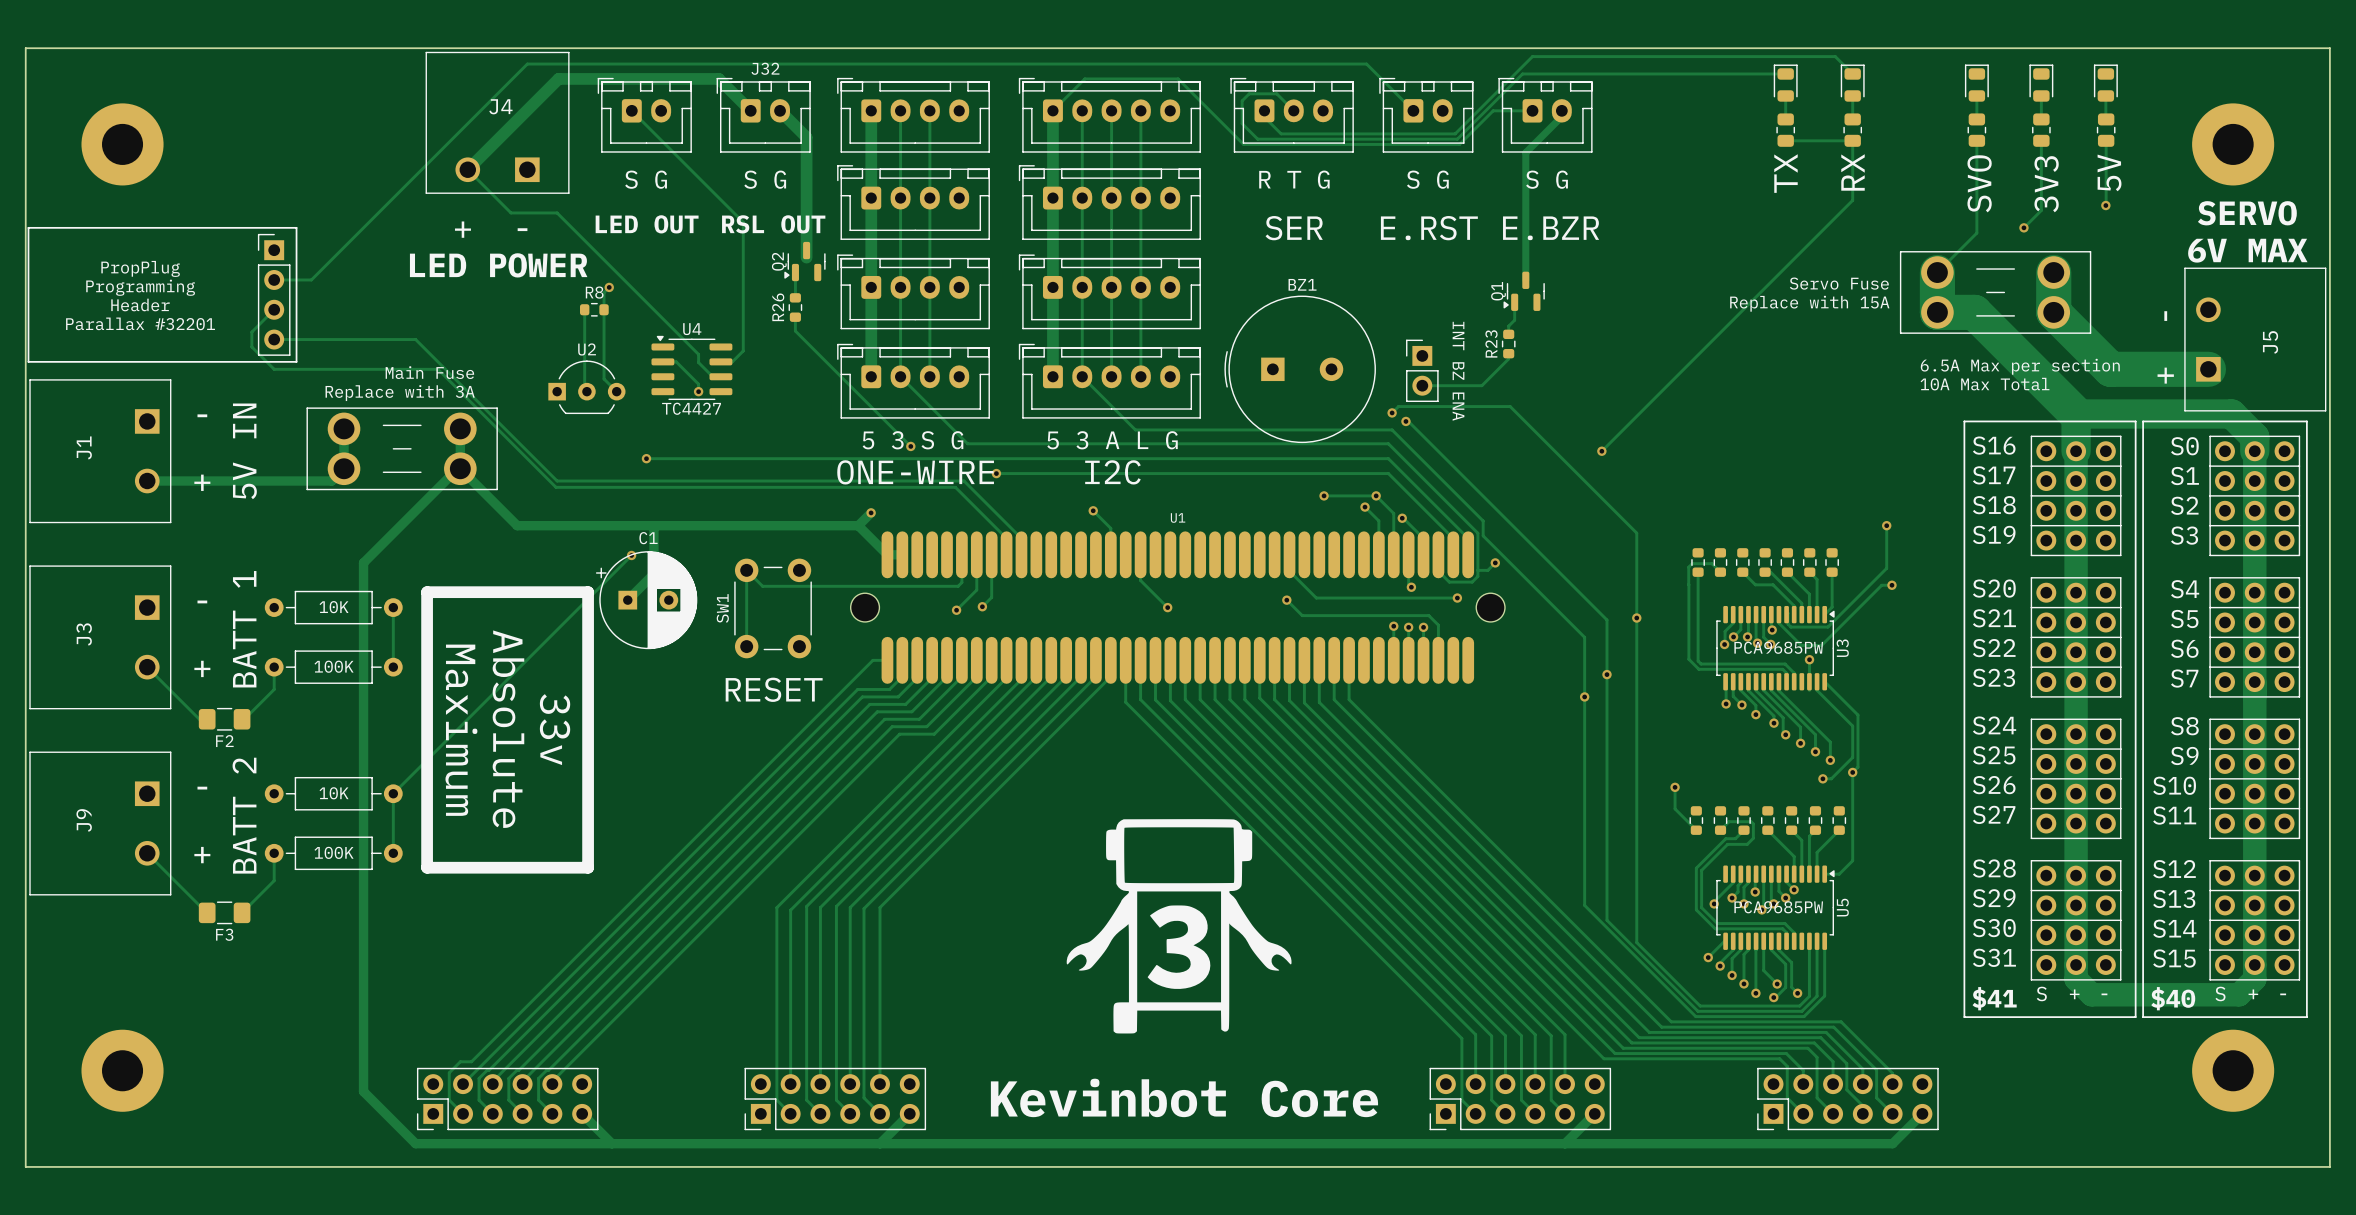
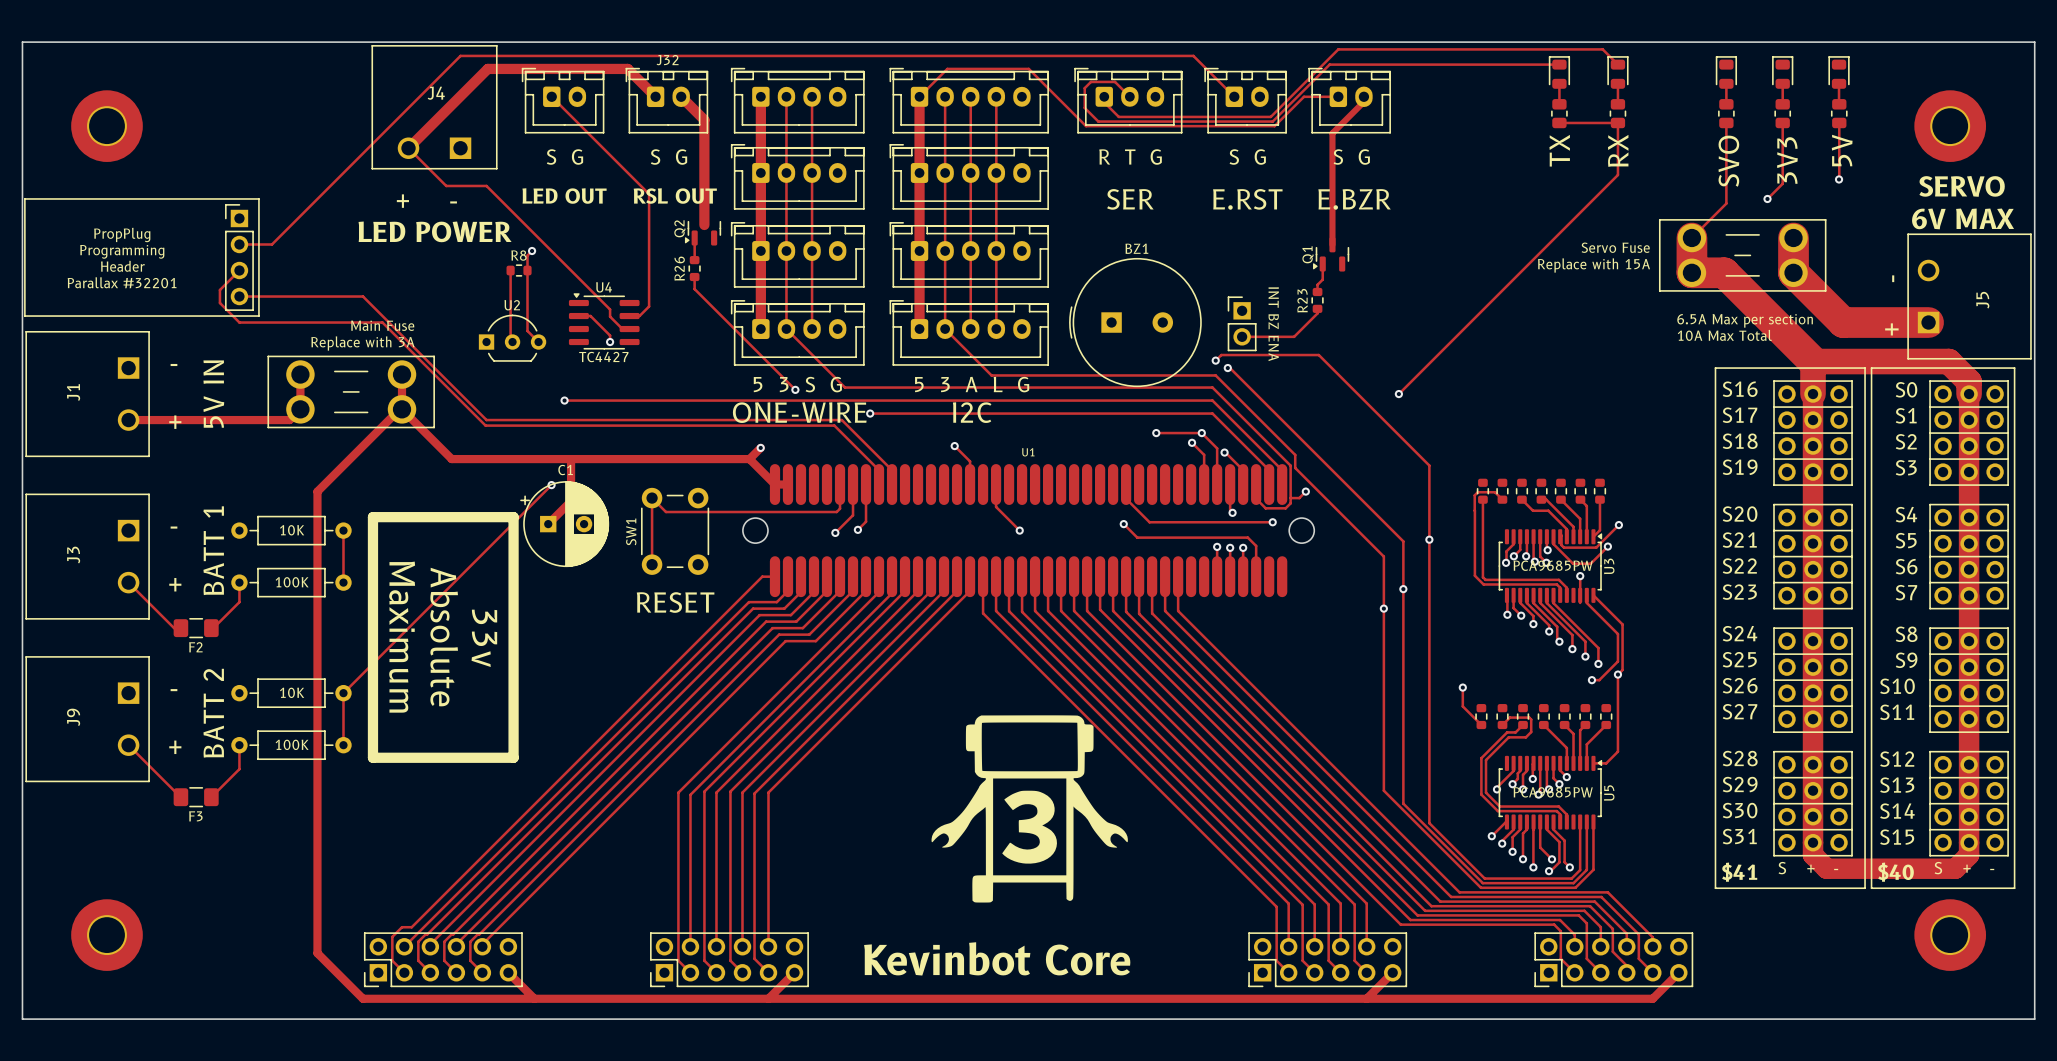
track: (1886, 525) (1886, 568) (1853, 601) -> none
via: (1886, 525) -> none
track: (1891, 585) (1881, 585) (1841, 625) -> none
via: (1891, 585) -> none
via: none -> (1618, 525)
via: none -> (1607, 546)

